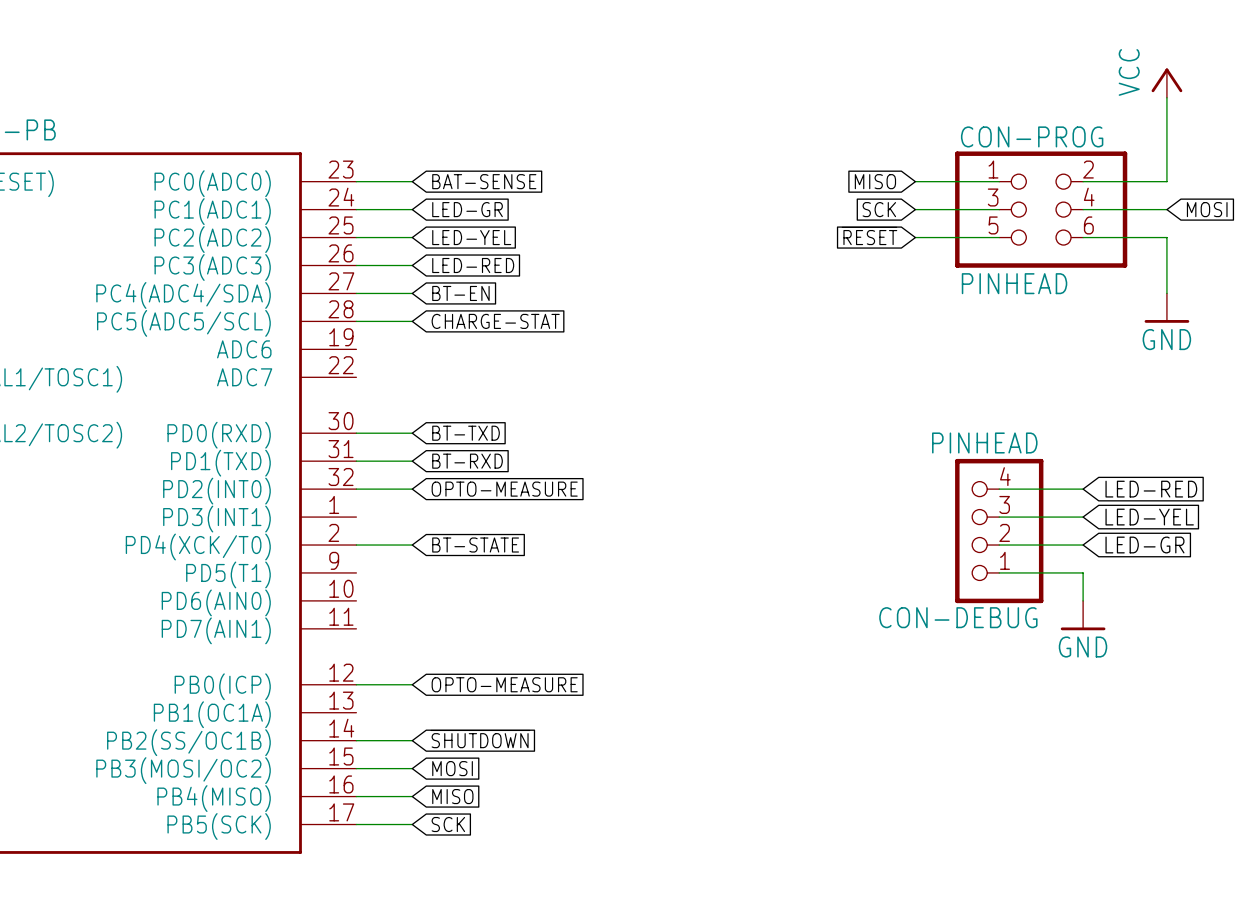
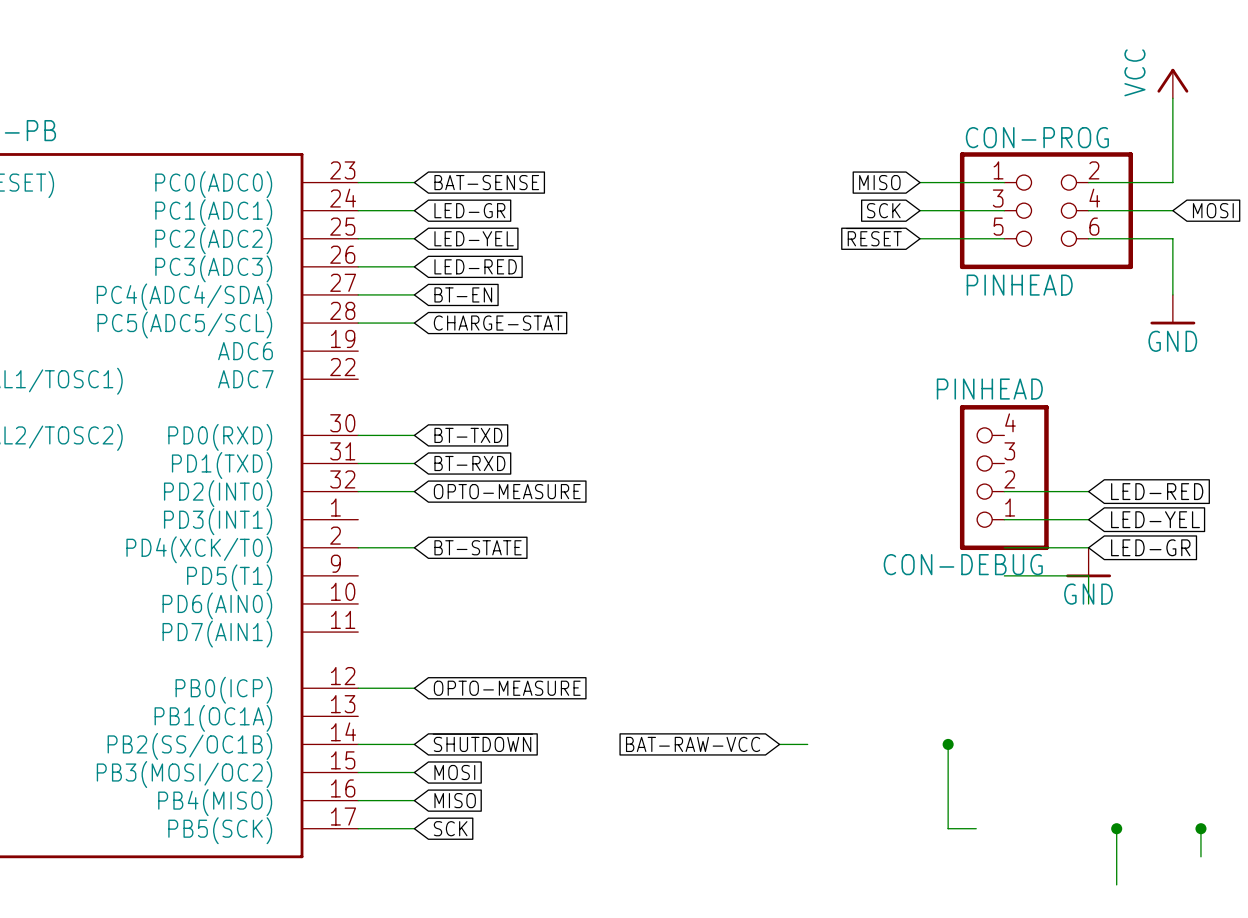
CON-DEBUG position: (999, 531) -> (1004, 477)
power symbol position: GND (1083, 615) -> GND (1088, 562)
global label: none -> BAT-RAW-VCC (693, 744)
wire: none -> (779, 744) (807, 744)
wire: none -> (948, 744) (948, 828) (976, 828)
junction: none -> (948, 744)
wire: none -> (1116, 828) (1116, 884)
junction: none -> (1116, 828)
wire: none -> (1200, 828) (1200, 856)
junction: none -> (1200, 828)

